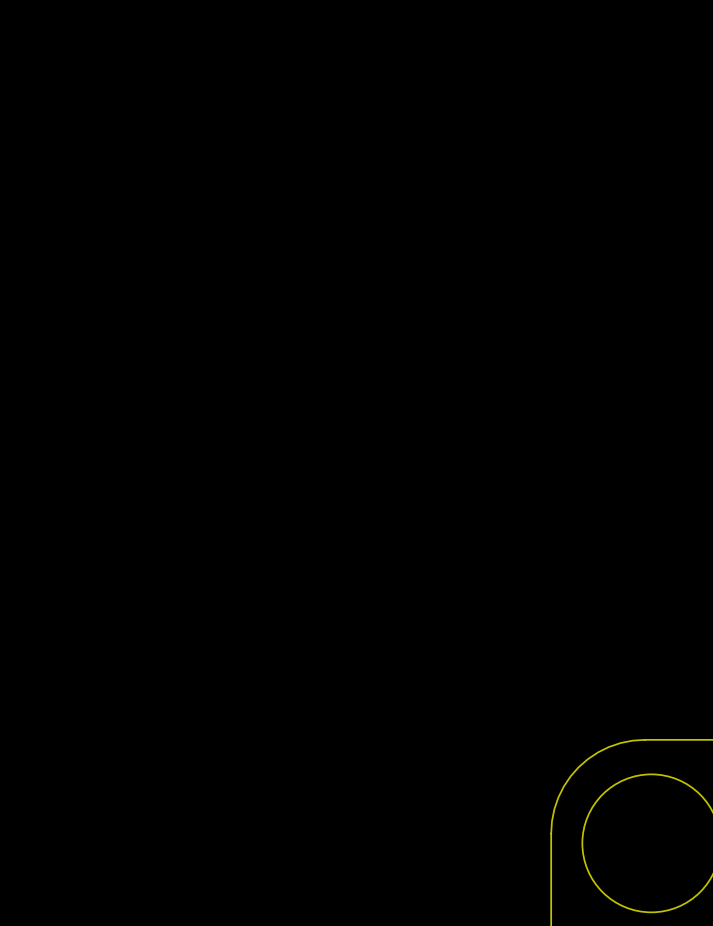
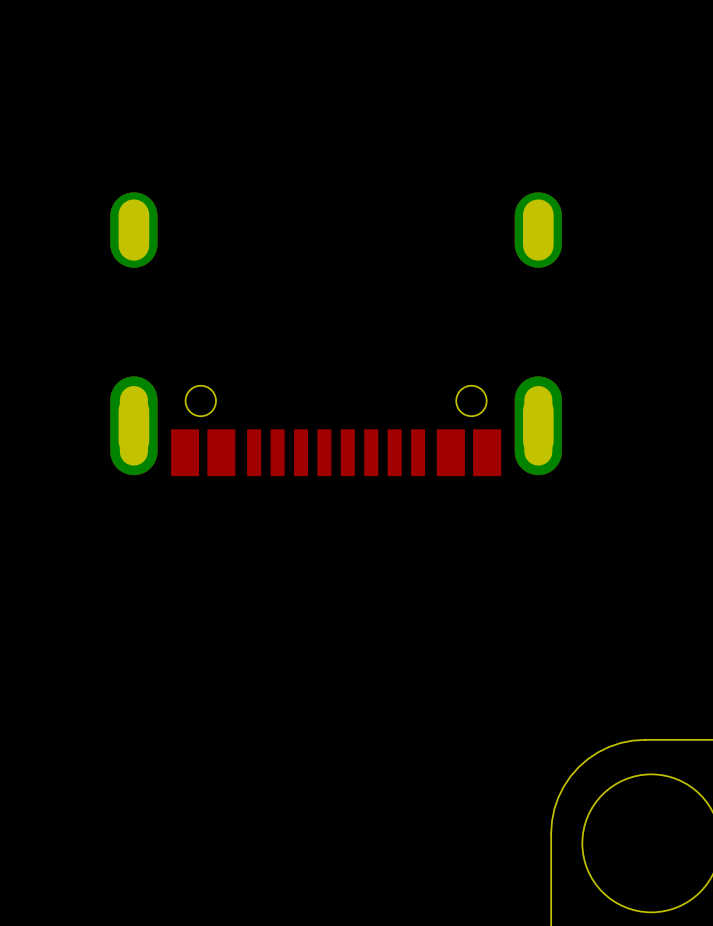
part: none -> (336, 334)

